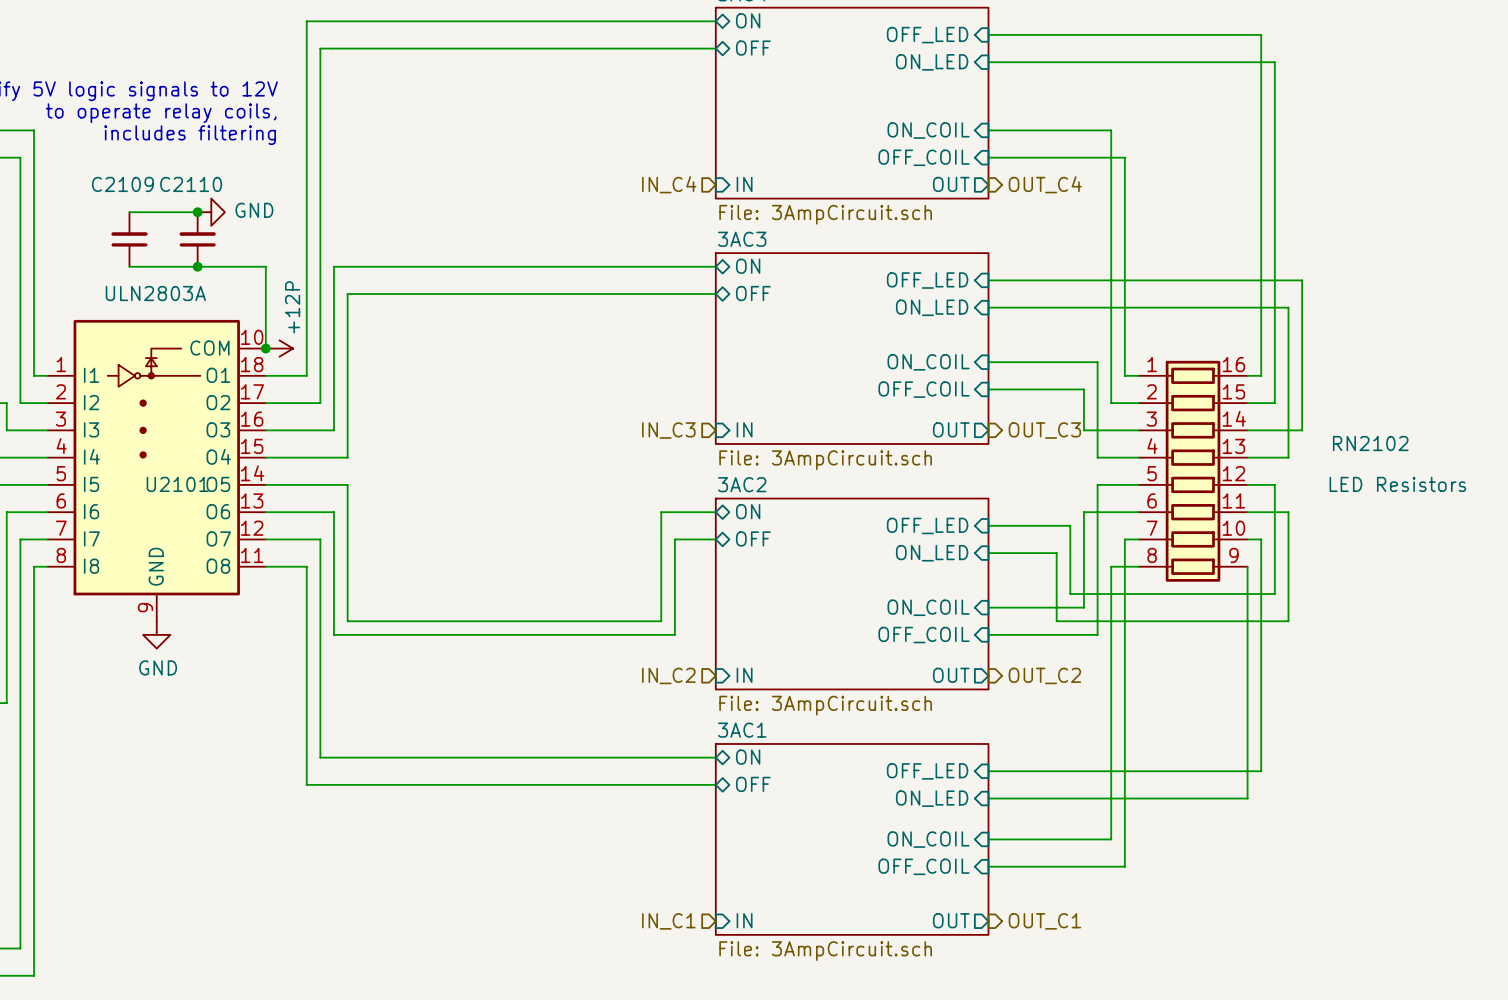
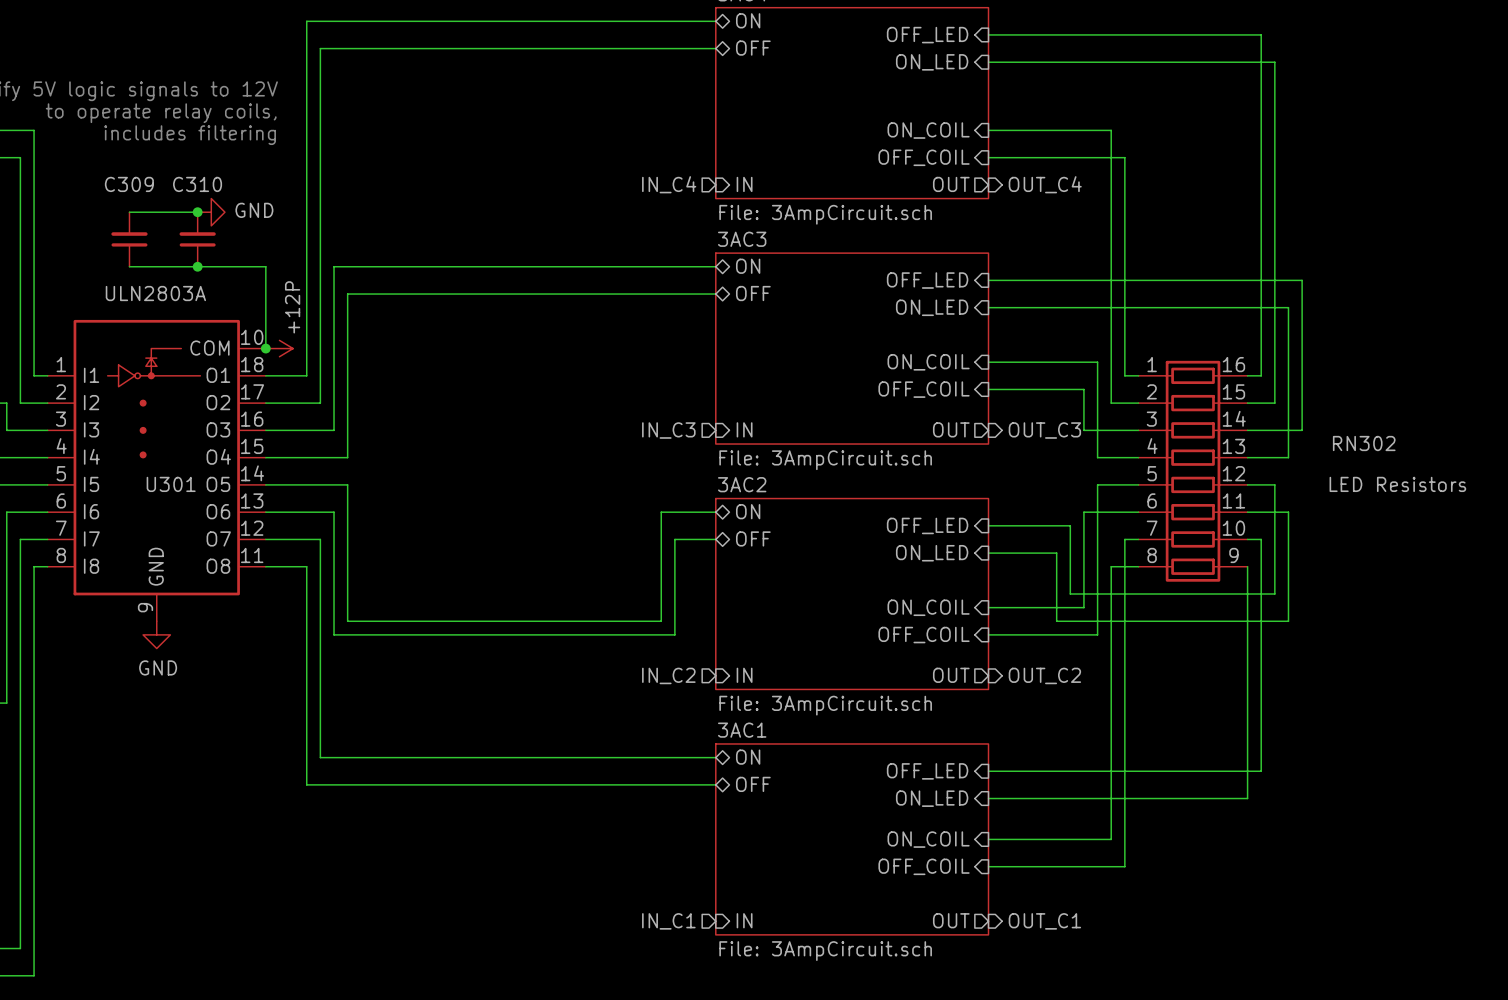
C2109 name: C2109 (122, 184) -> C309 (129, 184)
C2110 name: C2110 (191, 184) -> C310 (197, 184)
RN2102 name: RN2102 (1370, 443) -> RN302 (1364, 443)
U2101 name: U2101 (177, 484) -> U301 (171, 484)

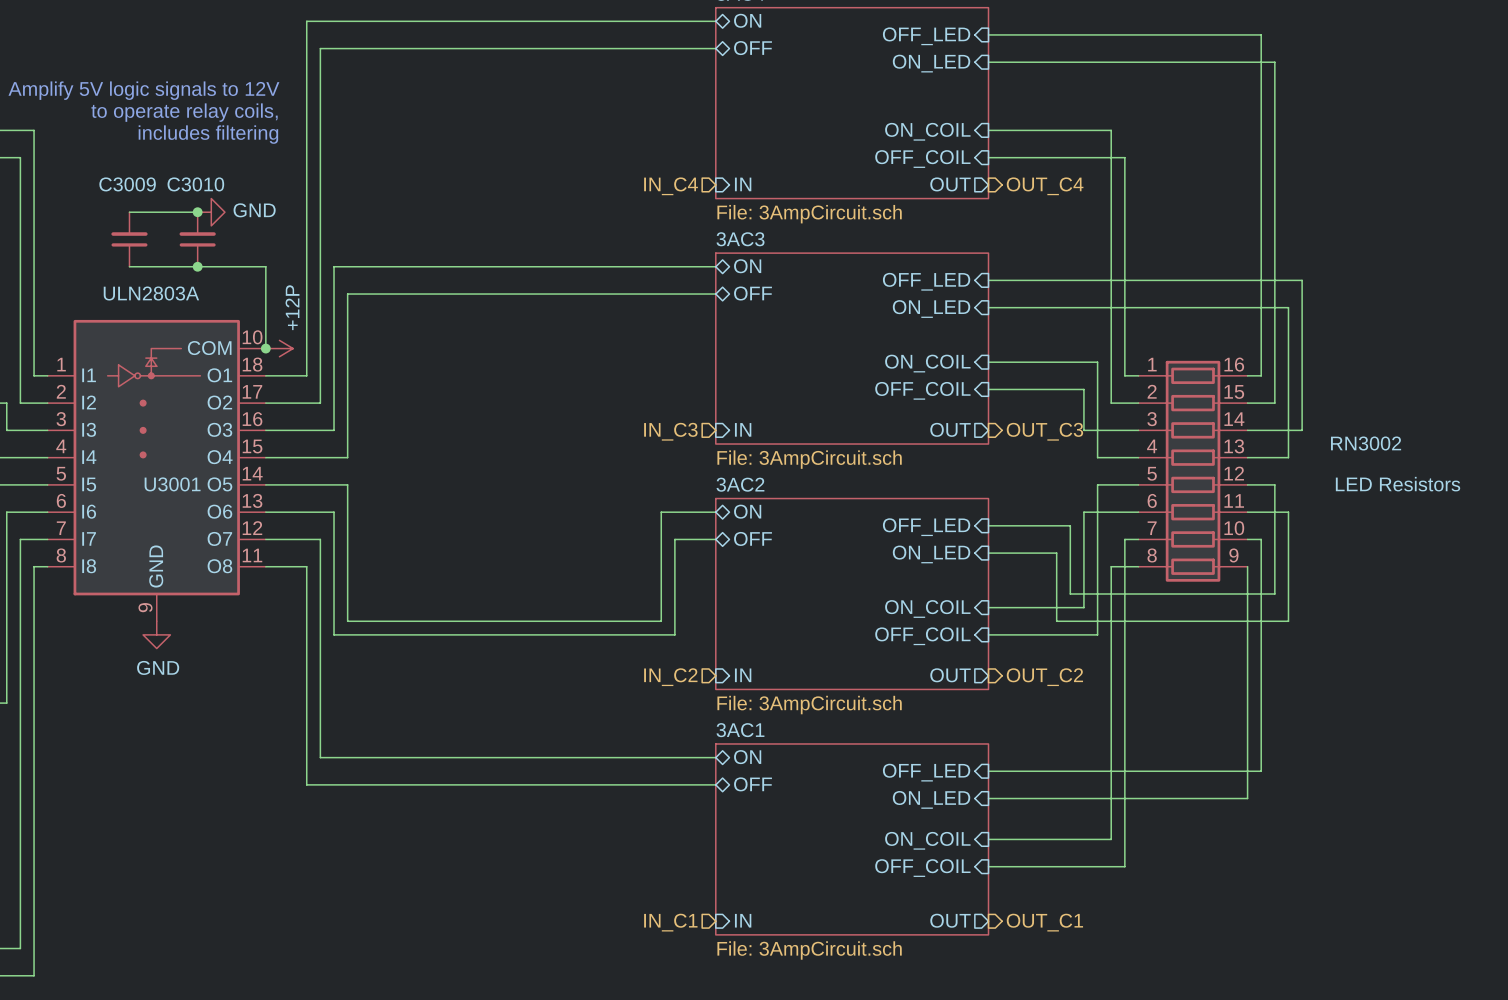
C309 name: C309 (129, 184) -> C3009 (127, 184)
C310 name: C310 (197, 184) -> C3010 (195, 184)
RN302 name: RN302 (1364, 443) -> RN3002 (1366, 443)
U301 name: U301 (171, 484) -> U3001 (172, 484)

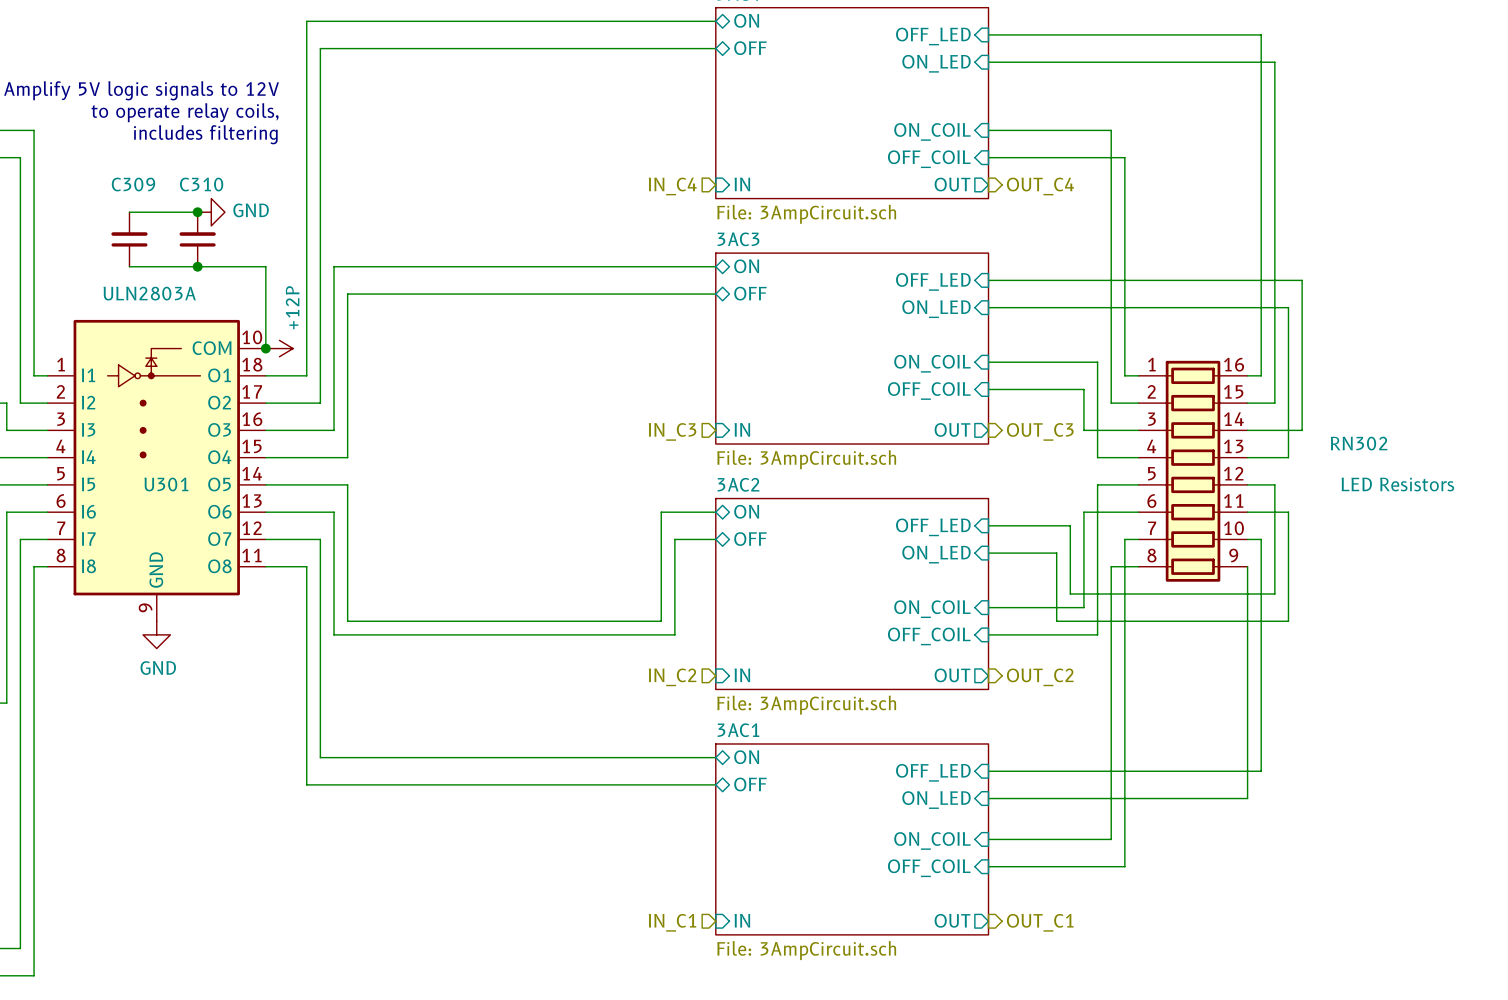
C3009 name: C3009 (127, 184) -> C309 (133, 184)
C3010 name: C3010 (195, 184) -> C310 (201, 184)
RN3002 name: RN3002 (1366, 443) -> RN302 (1359, 443)
U3001 name: U3001 (172, 484) -> U301 (166, 484)

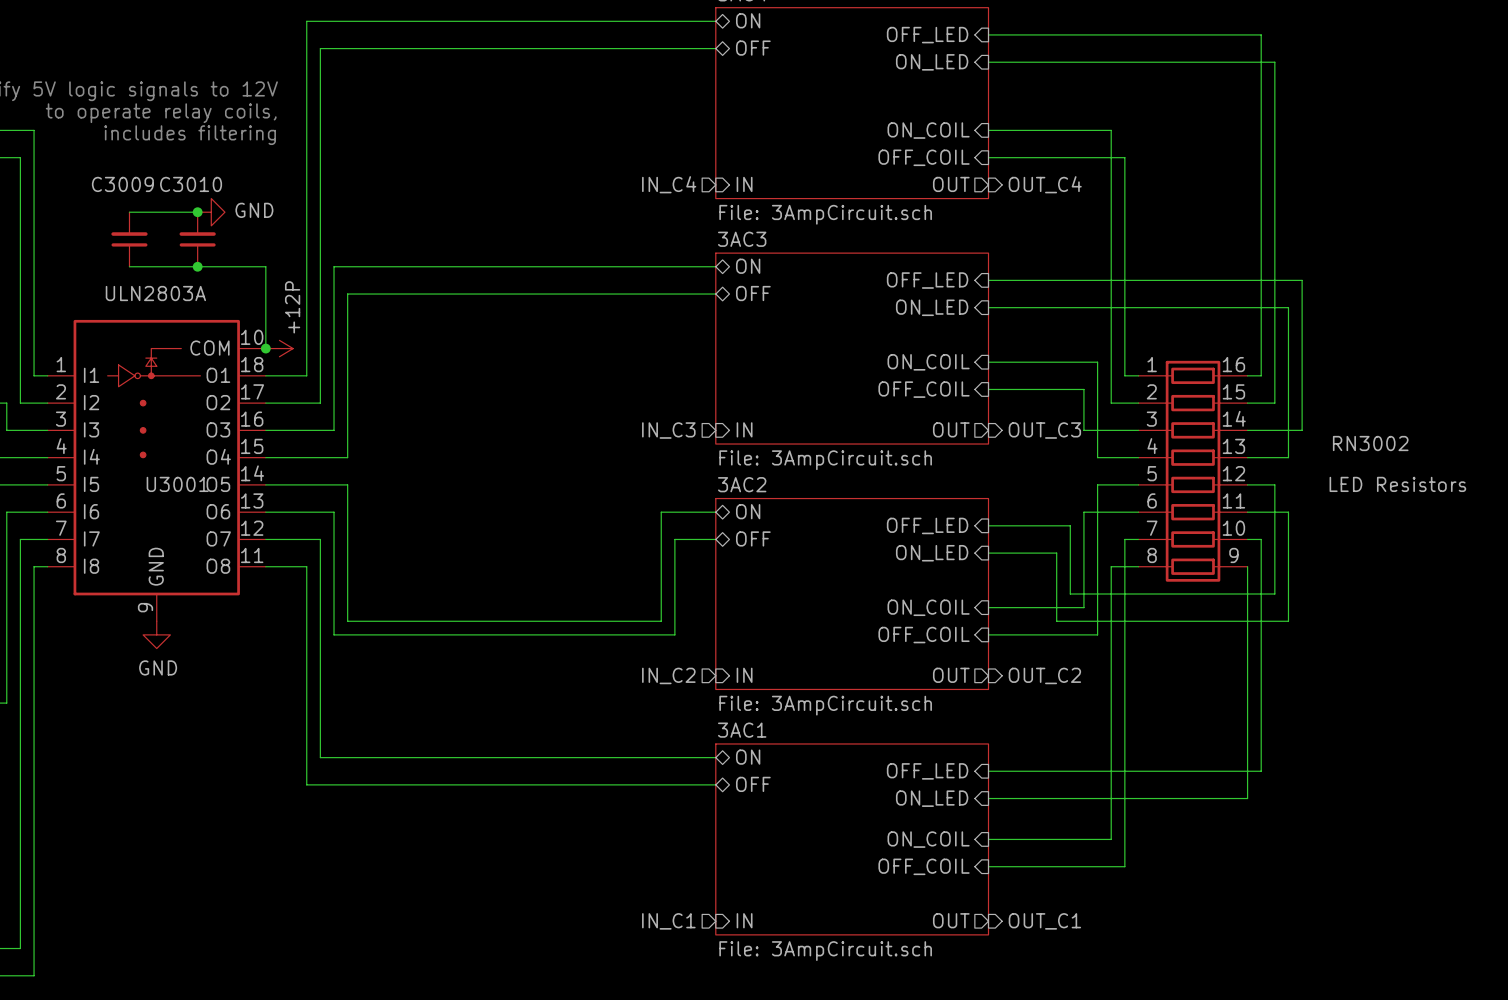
C309 name: C309 (133, 184) -> C3009 (122, 184)
C310 name: C310 (201, 184) -> C3010 (191, 184)
RN302 name: RN302 (1359, 443) -> RN3002 (1370, 443)
U301 name: U301 (166, 484) -> U3001 (177, 484)

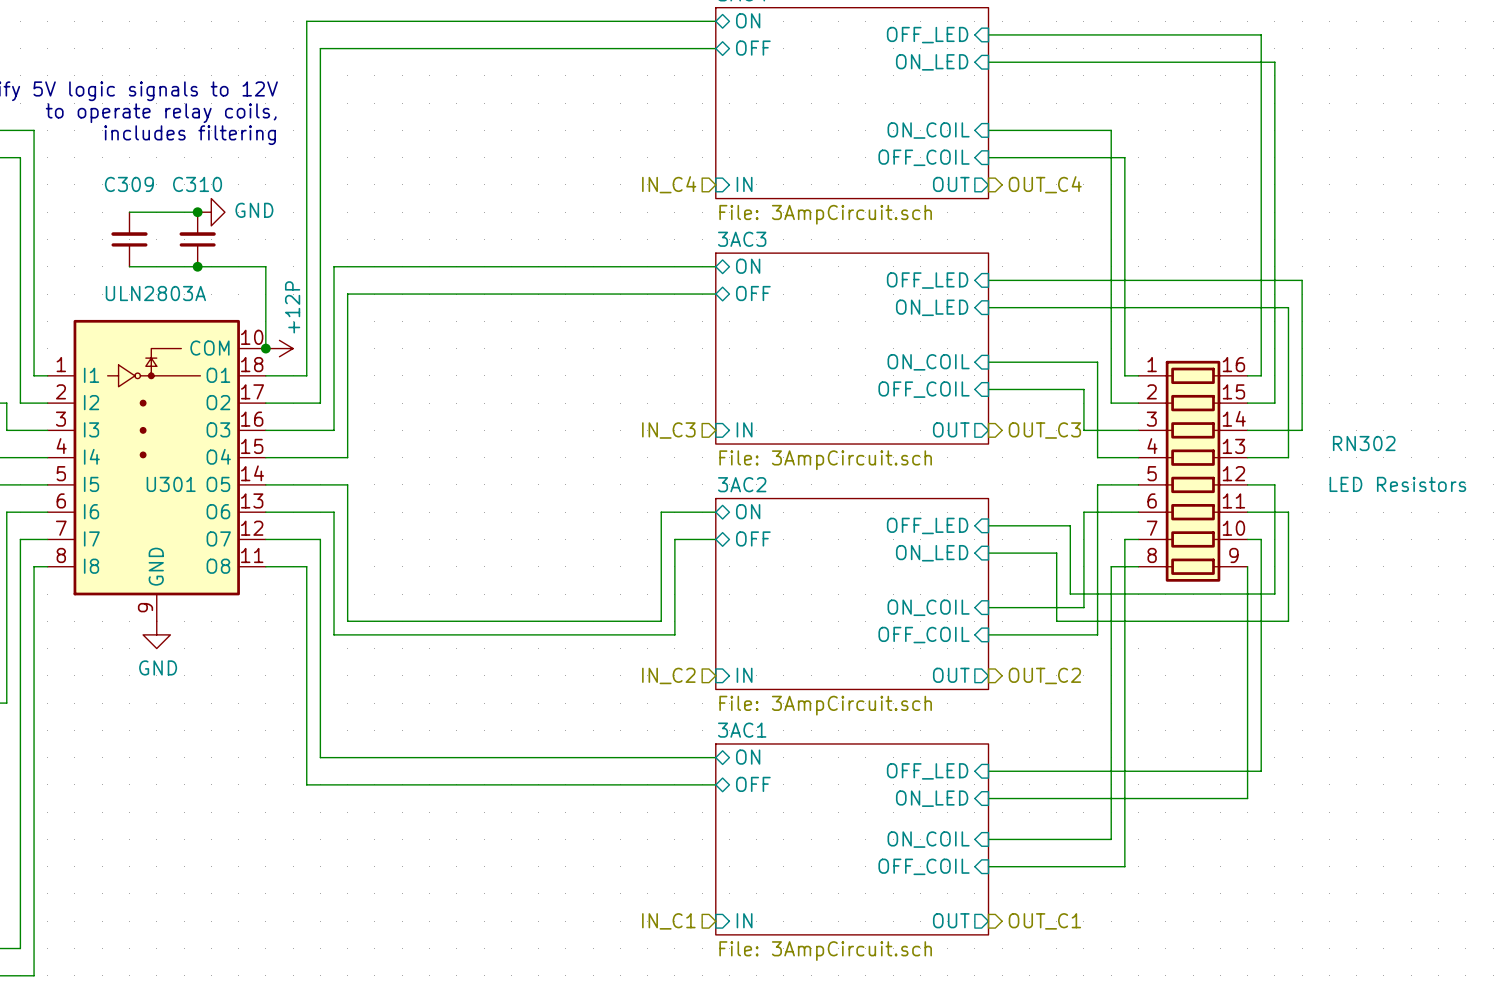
C3009 name: C3009 (122, 184) -> C309 (129, 184)
C3010 name: C3010 (191, 184) -> C310 (197, 184)
RN3002 name: RN3002 (1370, 443) -> RN302 (1364, 443)
U3001 name: U3001 (177, 484) -> U301 (171, 484)

